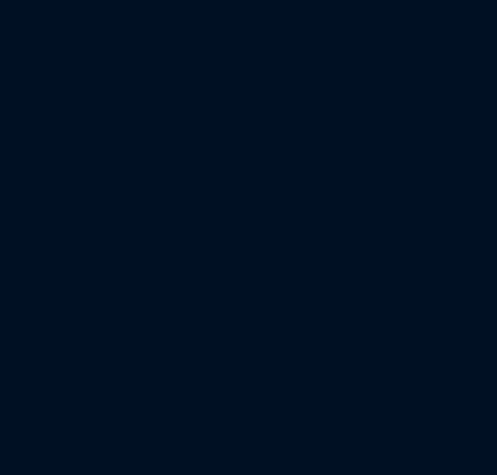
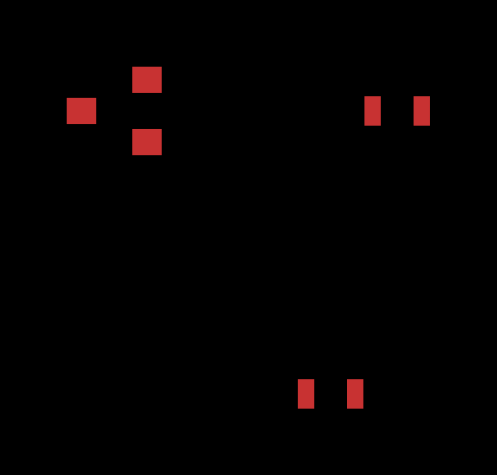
part: none -> (114, 110)
part: none -> (397, 110)
part: none -> (330, 393)

